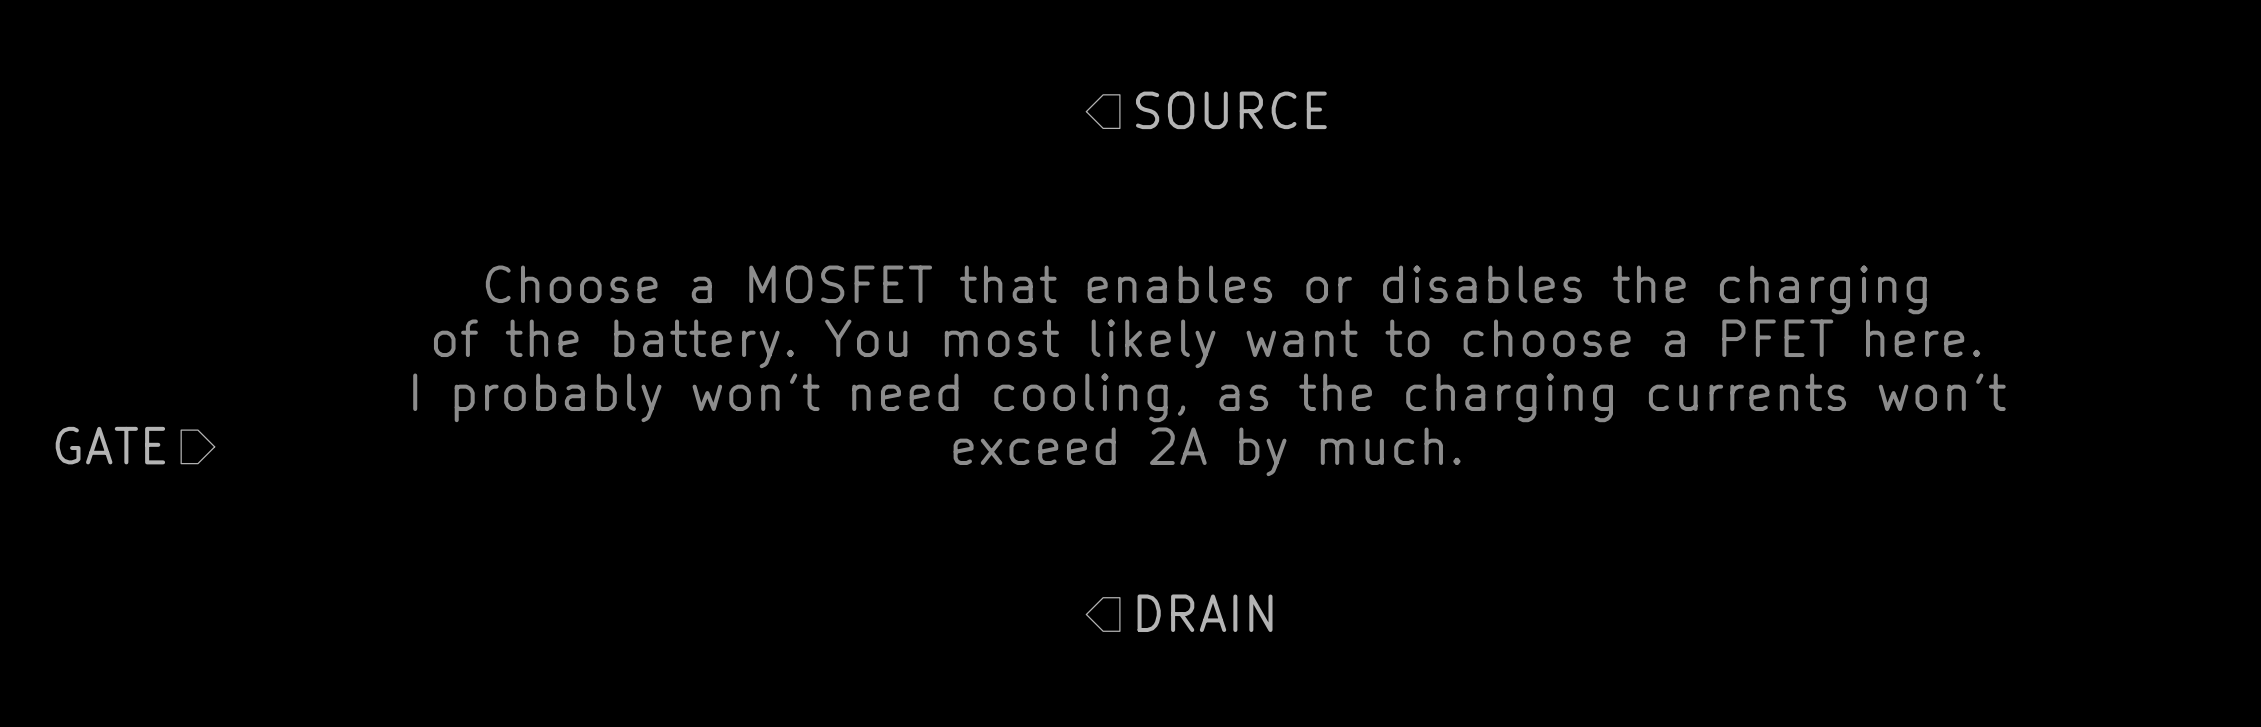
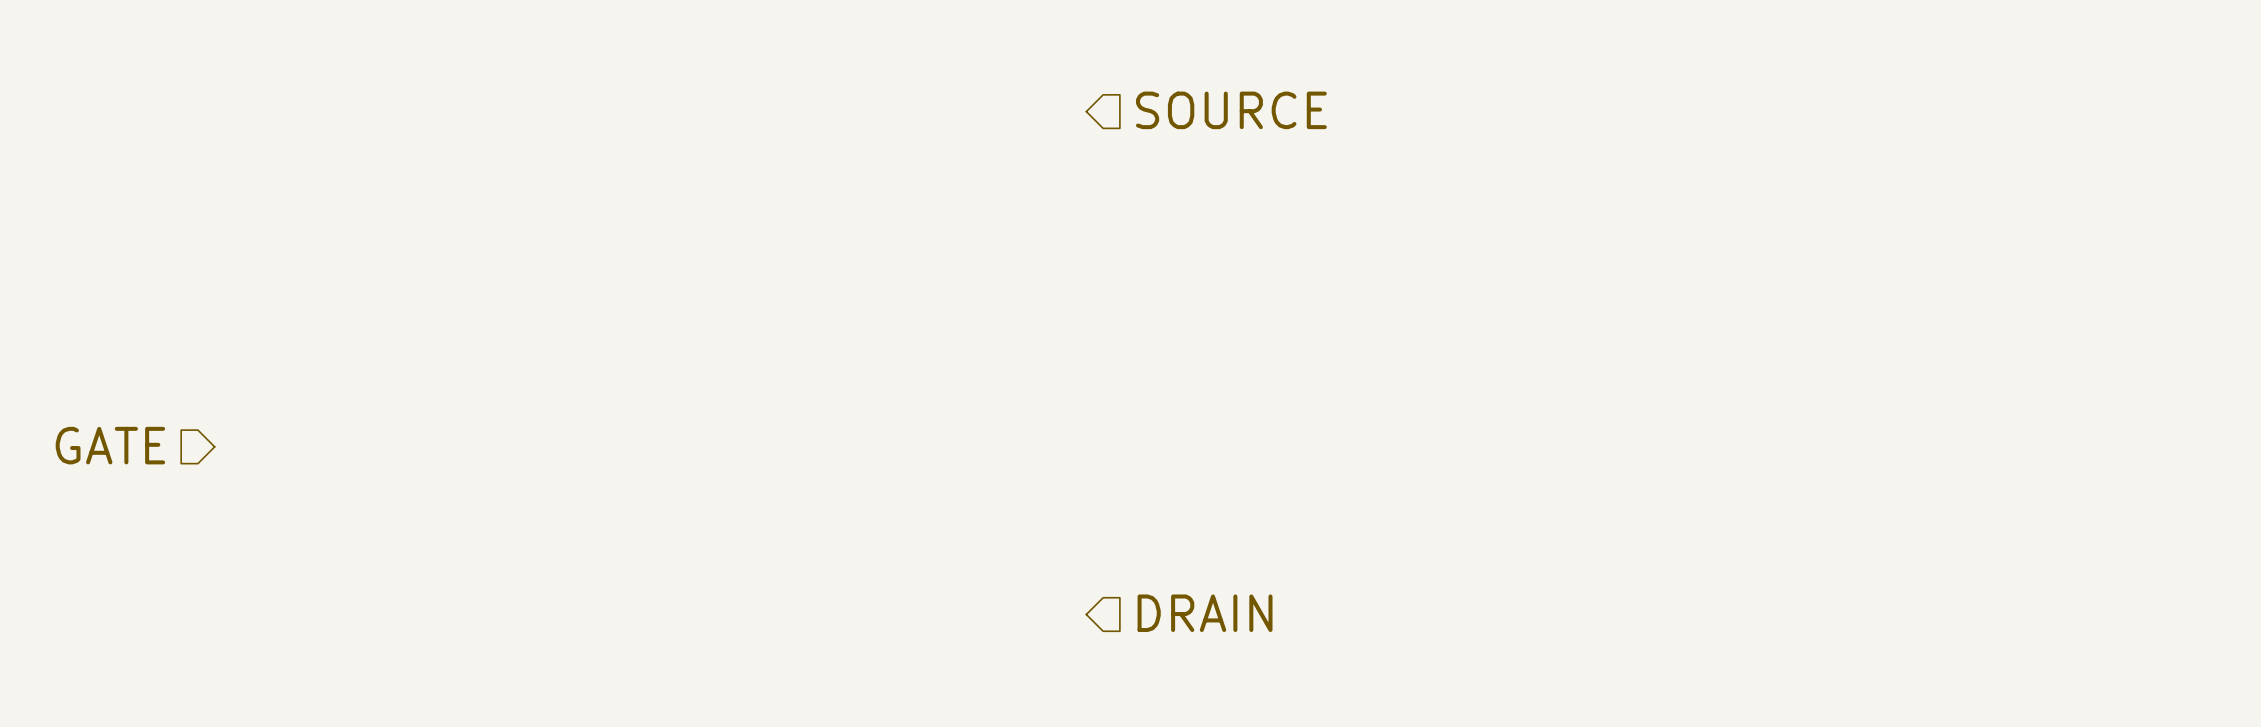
text: Choose a MOSFET that enables or disables the charging (1206, 289) -> none
text: of the battery. You most likely want to choose a PFET here. (1207, 343) -> none
text: I probably won't need cooling, as the charging currents won't (1209, 397) -> none
text: exceed 2A by much. (1207, 451) -> none

